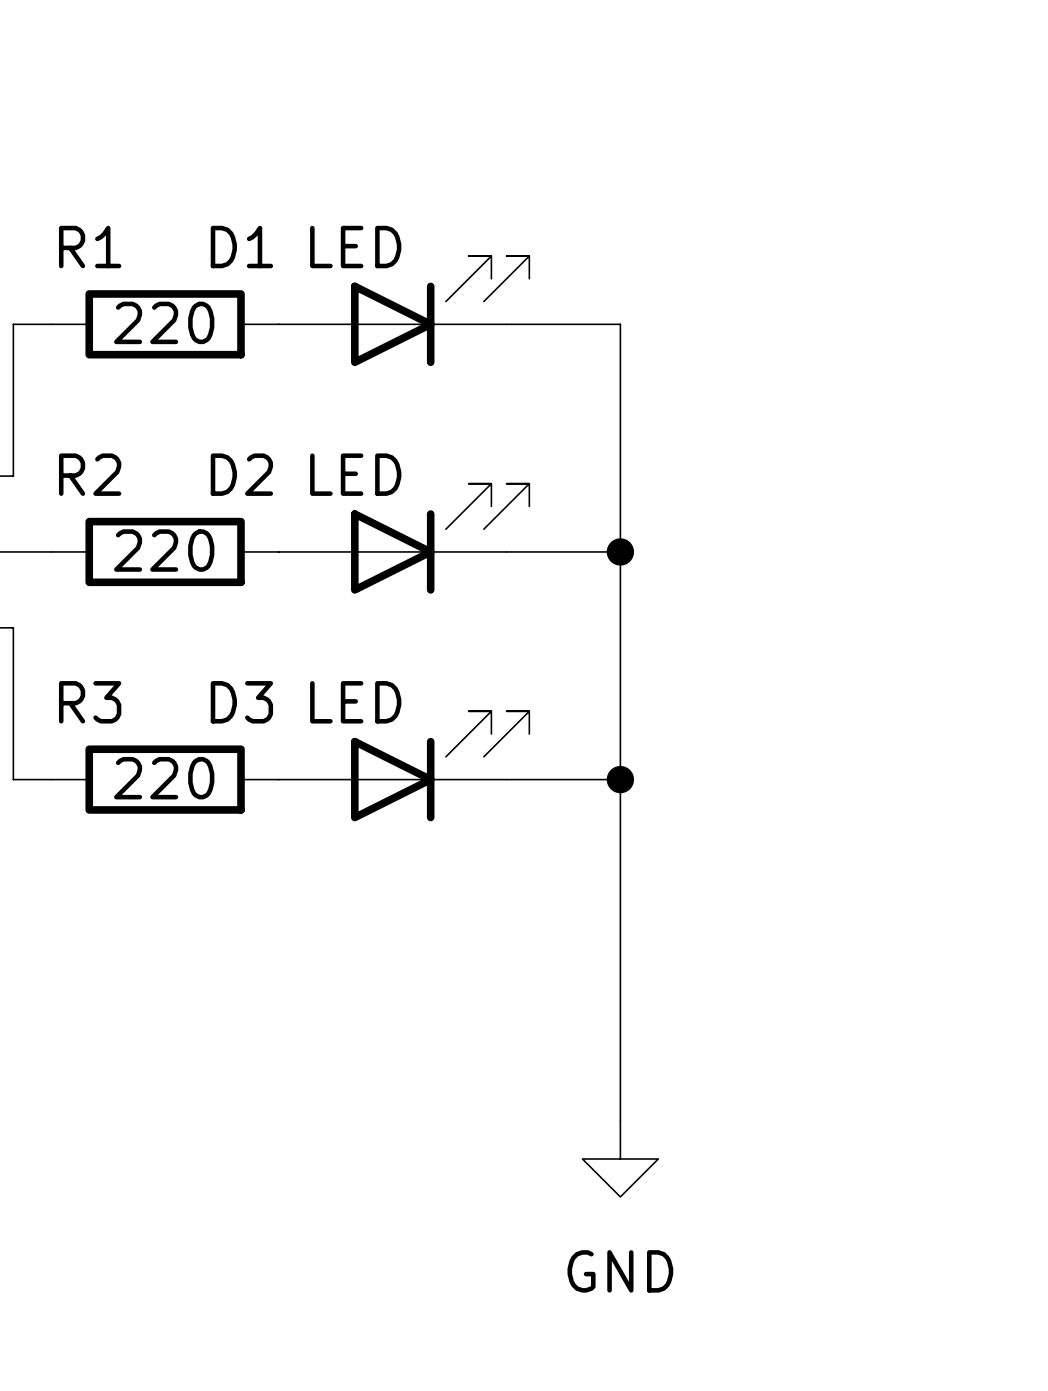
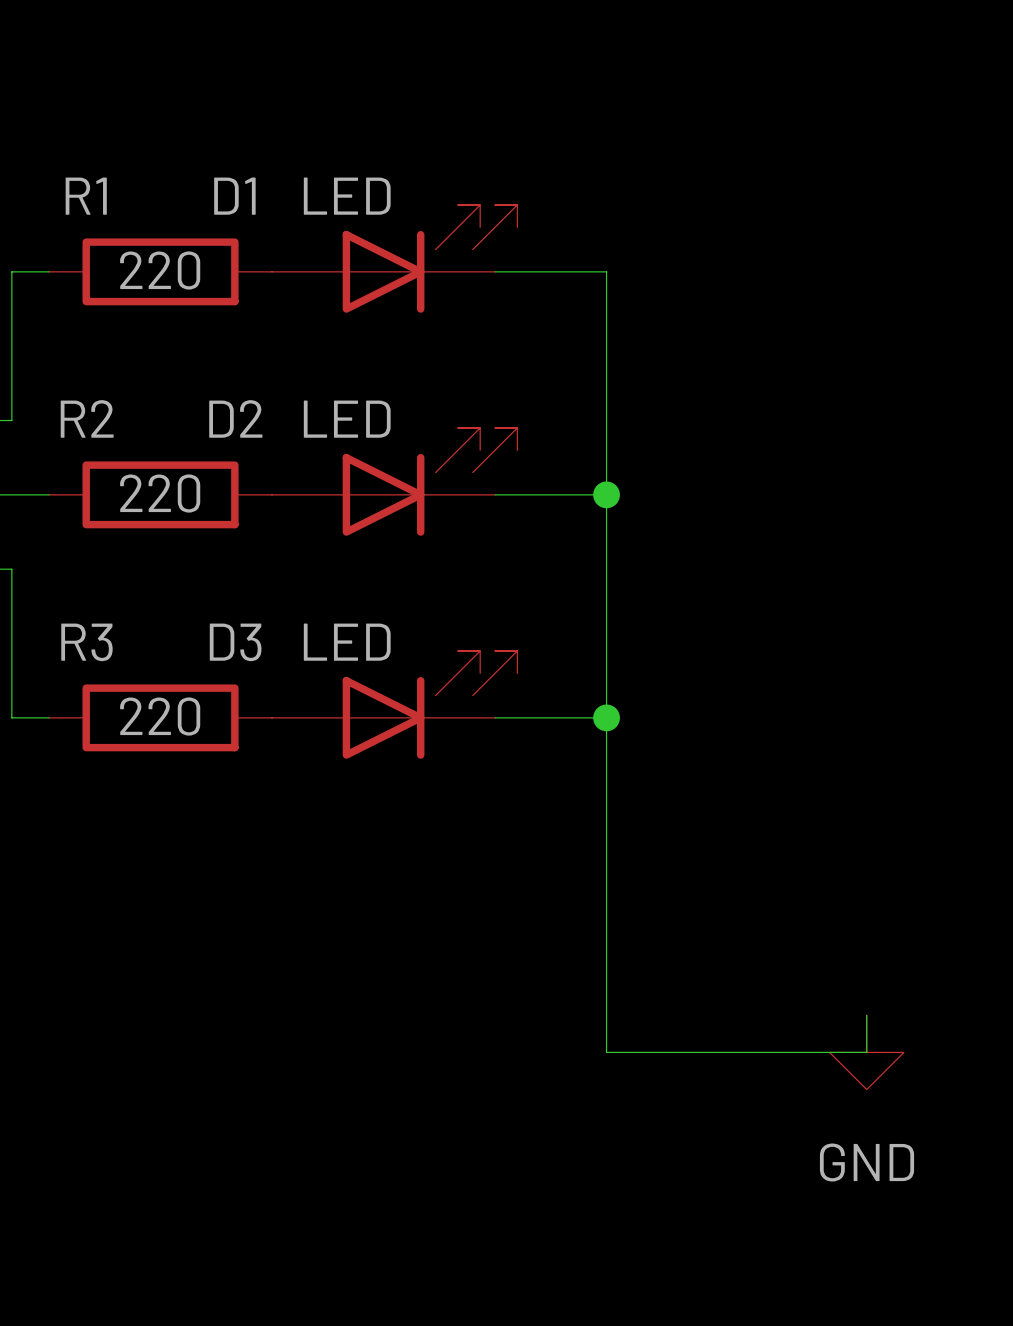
wire: none -> (866, 1015) (866, 1052) (606, 1052)
power symbol position: GND (620, 1158) -> GND (866, 1052)

